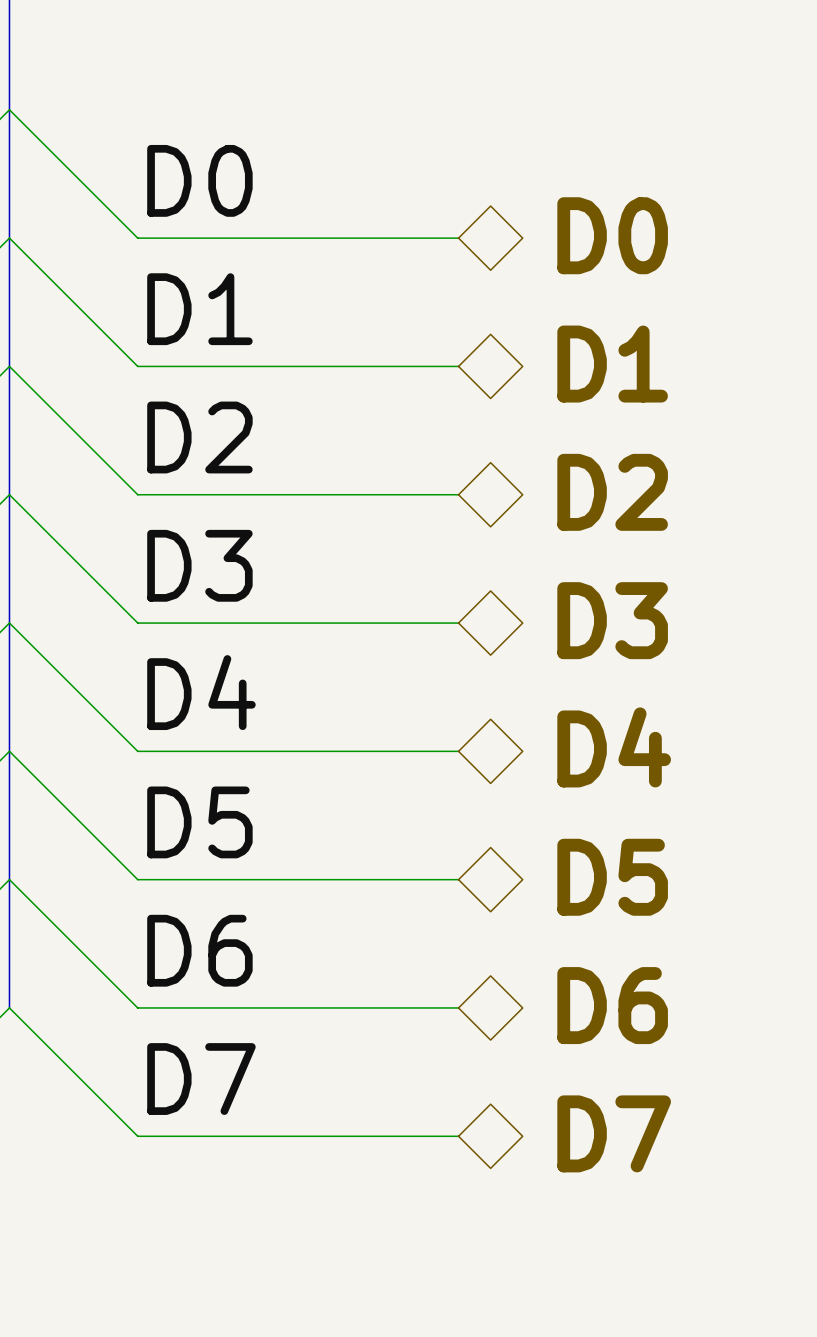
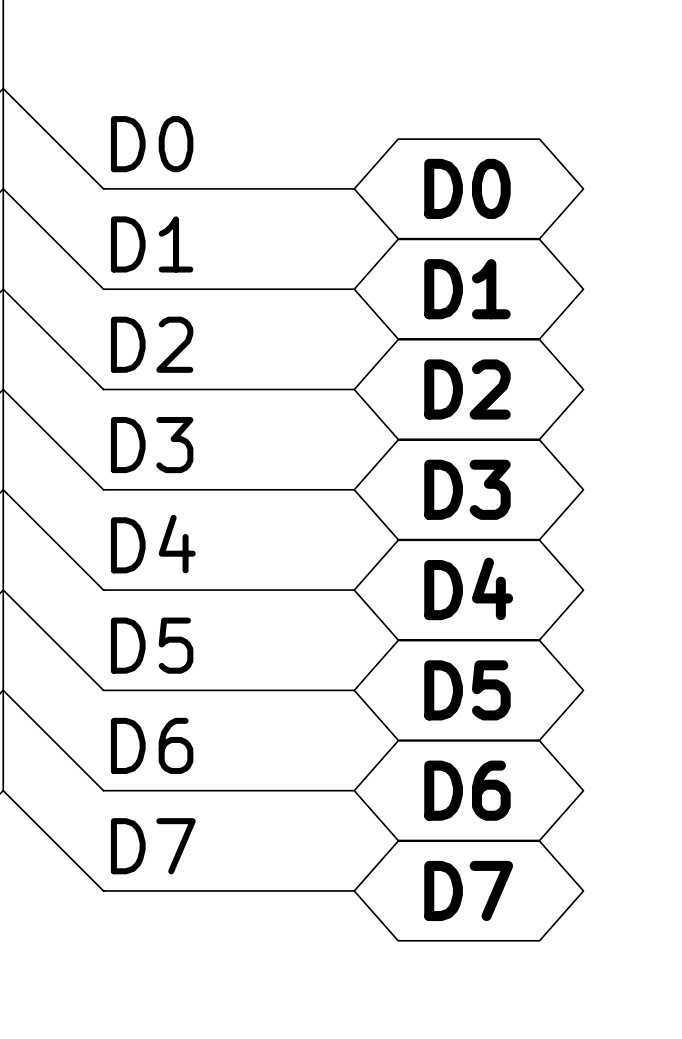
hierarchical label: D0 (612, 235) -> none
global label: none -> D0 (467, 188)
hierarchical label: D1 (612, 364) -> none
global label: none -> D1 (467, 289)
hierarchical label: D2 (612, 492) -> none
global label: none -> D2 (467, 389)
hierarchical label: D3 (612, 620) -> none
global label: none -> D3 (467, 489)
hierarchical label: D4 (614, 747) -> none
global label: none -> D4 (468, 588)
hierarchical label: D5 (612, 877) -> none
global label: none -> D5 (467, 690)
hierarchical label: D6 (612, 1005) -> none
global label: none -> D6 (467, 790)
hierarchical label: D7 (614, 1133) -> none
global label: none -> D7 (468, 890)

